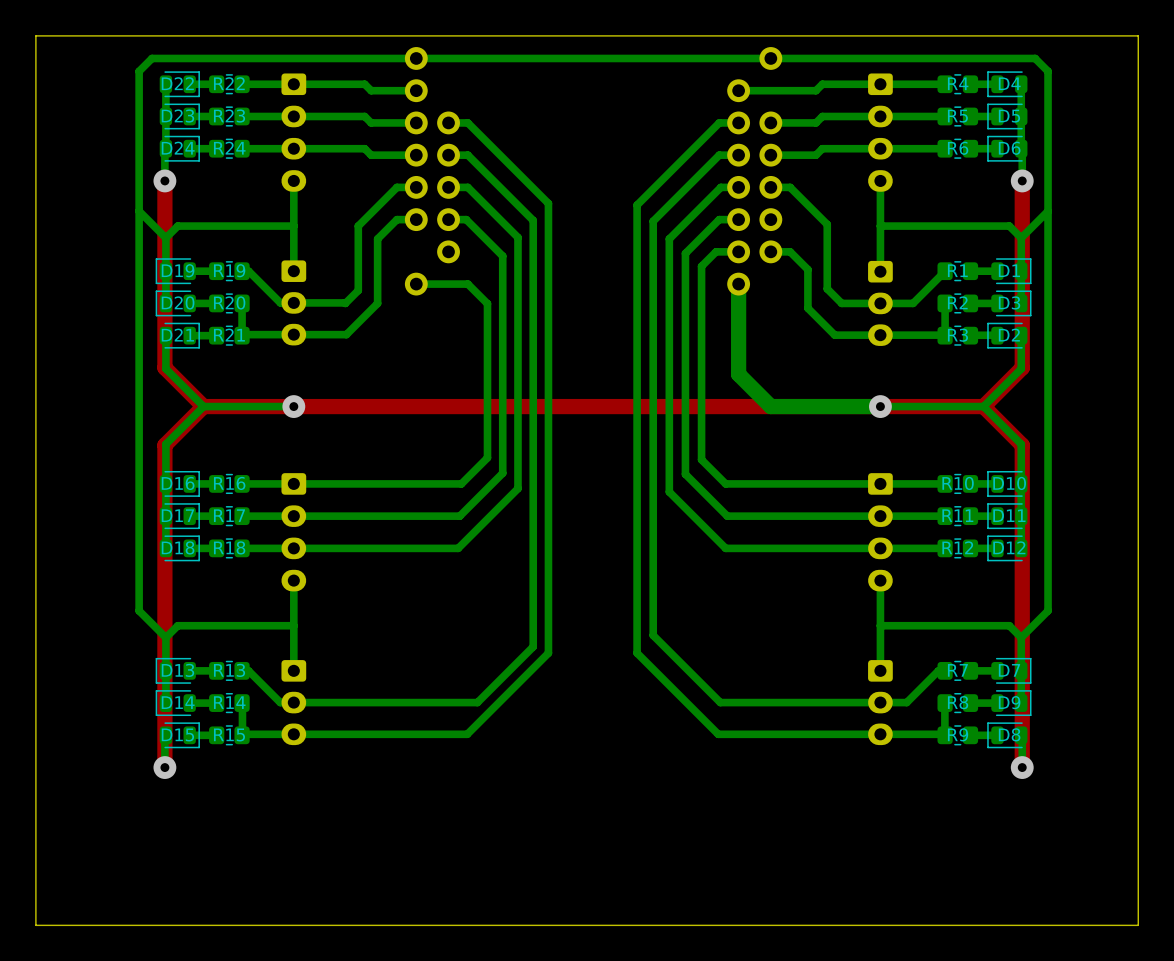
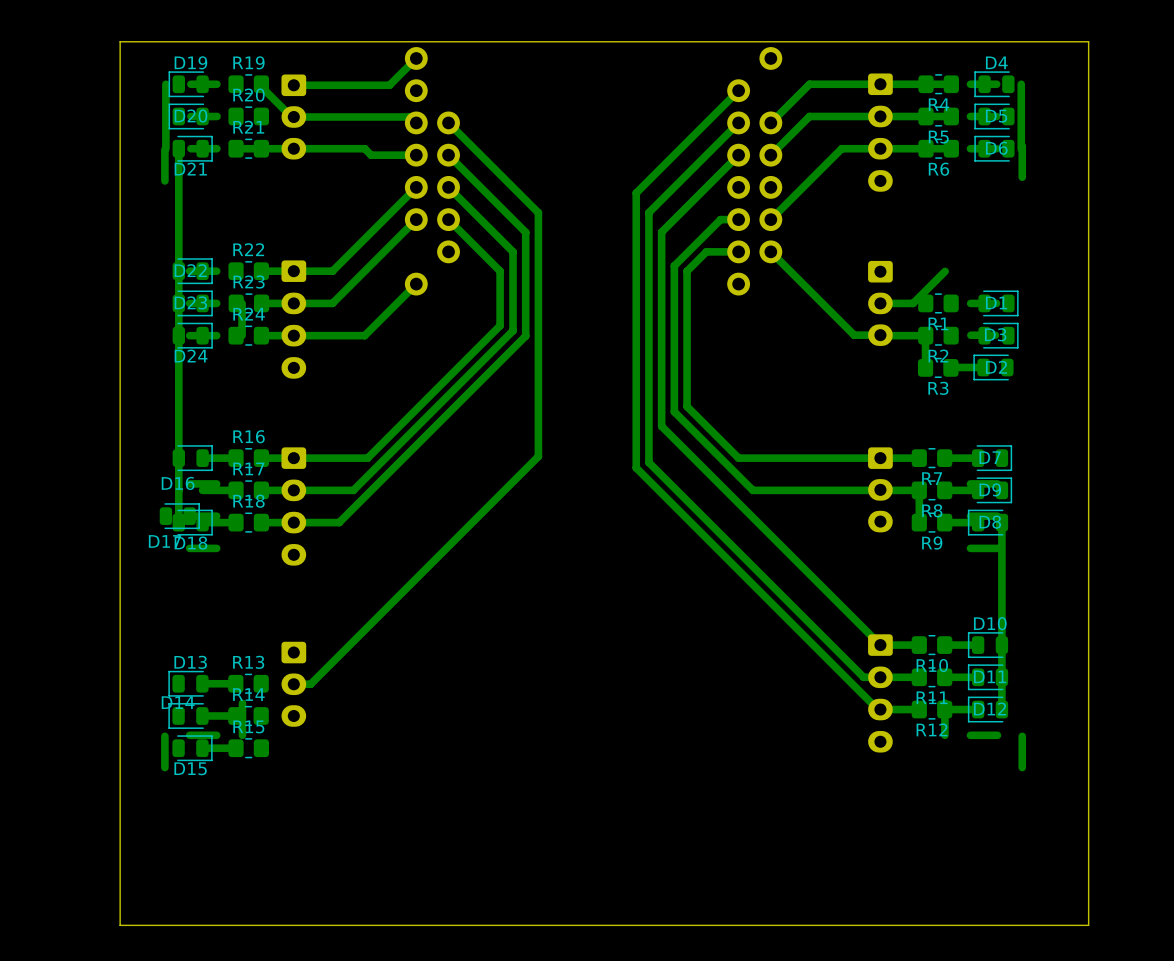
bottom track: none -> (416, 58) (389, 85) (293, 85)
R22 name position: R22 (229, 83) -> R22 (248, 249)
R4 name position: R4 (958, 83) -> R4 (939, 104)
D4 name position: D4 (1009, 83) -> D4 (996, 62)
D22 position: (179, 84) -> (192, 271)
R22 position: (229, 84) -> (248, 271)
bottom track: (242, 84) (364, 84) (371, 90) (416, 90) -> none
bottom track: (822, 84) (815, 90) (738, 90) -> (919, 709) (877, 709) (636, 467) (636, 193) (738, 90)
R4 position: (957, 84) -> (938, 84)
D4 position: (1007, 84) -> (994, 84)
D23 position: (179, 116) -> (192, 303)
R23 position: (229, 116) -> (248, 303)
R23 name position: R23 (229, 116) -> R23 (249, 282)
bottom track: (242, 116) (364, 116) (371, 122) (416, 122) -> (261, 84) (261, 86) (291, 116) (410, 116) (416, 122)
bottom track: (822, 116) (815, 122) (770, 122) -> (822, 84) (809, 84) (770, 122)
R5 position: (957, 116) -> (938, 116)
R5 name position: R5 (957, 116) -> R5 (938, 137)
D5 position: (1007, 116) -> (994, 116)
bottom track: (448, 122) (467, 122) (548, 203) (548, 653) (467, 734) (243, 734) -> (448, 122) (538, 212) (538, 456) (310, 684) (293, 683)
bottom track: (738, 122) (719, 122) (637, 205) (637, 653) (718, 734) (944, 734) -> (738, 122) (648, 212) (648, 462) (863, 677) (919, 677)
part: (293, 132) -> none
bottom track: none -> (178, 148) (178, 522)
D24 name position: D24 (178, 148) -> D24 (191, 356)
D24 position: (179, 148) -> (192, 335)
R24 position: (229, 148) -> (248, 335)
R24 name position: R24 (229, 148) -> R24 (249, 314)
bottom track: (841, 148) (822, 148) (815, 155) (770, 155) -> (822, 116) (809, 116) (770, 155)
bottom track: none -> (841, 148) (770, 219)
R6 position: (957, 148) -> (938, 148)
R6 name position: R6 (958, 148) -> R6 (938, 169)
D6 position: (1007, 148) -> (994, 148)
bottom track: (448, 155) (467, 155) (533, 220) (533, 646) (477, 702) (280, 702) (248, 670) (242, 670) -> (448, 155) (525, 232) (525, 336) (339, 522) (261, 522)
bottom track: (738, 155) (719, 155) (653, 221) (653, 635) (720, 702) (906, 702) (938, 670) (945, 670) -> (738, 155) (661, 232) (661, 426) (880, 645) (919, 645)
top track: (164, 180) (164, 367) (203, 406) -> none
via: (164, 180) -> none
bottom track: (293, 180) (293, 271) -> none
bottom track: (880, 180) (880, 271) -> none
top track: (1022, 180) (1022, 367) (983, 406) -> none
via: (1022, 180) -> none
bottom track: (416, 187) (396, 187) (358, 226) (358, 290) (345, 303) (280, 302) (248, 271) (242, 271) -> (416, 187) (332, 271) (261, 271)
bottom track: (448, 187) (467, 187) (517, 237) (517, 488) (458, 548) (242, 548) -> (448, 187) (513, 251) (513, 330) (353, 490) (261, 490)
bottom track: (738, 187) (720, 187) (669, 238) (669, 491) (725, 548) (944, 548) -> none
bottom track: (770, 187) (790, 187) (827, 224) (827, 288) (841, 303) (880, 303) -> none
bottom track: (139, 211) (165, 237) -> none
bottom track: (1048, 211) (1021, 237) -> none
bottom track: (416, 219) (396, 219) (377, 238) (377, 303) (346, 334) (243, 334) -> (416, 219) (332, 303) (261, 303)
bottom track: (448, 219) (466, 219) (502, 256) (502, 473) (459, 516) (242, 516) -> (448, 219) (500, 271) (500, 325) (367, 458) (261, 458)
bottom track: (720, 219) (685, 253) (685, 474) (727, 516) (944, 516) -> (720, 219) (674, 265) (674, 411) (752, 490) (919, 490) (919, 522)
bottom track: (293, 226) (177, 226) (165, 237) -> none
bottom track: (880, 226) (1009, 226) (1021, 237) -> none
bottom track: (165, 237) (165, 303) -> none
bottom track: (1021, 237) (1021, 303) -> none
bottom track: (716, 251) (701, 266) (701, 459) (725, 483) (944, 483) -> (716, 251) (706, 251) (687, 271) (687, 406) (738, 458) (919, 458)
bottom track: (770, 251) (790, 251) (807, 269) (807, 308) (834, 335) (854, 335) -> (770, 251) (854, 335)
D19 name position: D19 (178, 270) -> D19 (190, 62)
R19 name position: R19 (229, 270) -> R19 (248, 62)
R1 name position: R1 (957, 270) -> R1 (938, 323)
D19 position: (175, 271) -> (188, 84)
R19 position: (229, 271) -> (248, 84)
R1 position: (957, 271) -> (938, 303)
bottom track: (996, 271) (970, 271) -> none
D1 position: (1011, 271) -> (998, 303)
bottom track: (416, 284) (467, 284) (487, 303) (487, 457) (461, 483) (242, 483) -> (416, 284) (364, 335) (261, 335)
bottom track: (738, 284) (738, 374) (770, 406) (983, 406) -> none
R20 name position: R20 (229, 302) -> R20 (248, 95)
part position: (293, 302) -> (293, 116)
R2 name position: R2 (957, 302) -> R2 (938, 356)
D20 position: (175, 303) -> (188, 116)
R20 position: (229, 303) -> (248, 116)
bottom track: (945, 303) (945, 335) -> none
R2 position: (957, 303) -> (938, 335)
D2 position: (1011, 303) -> (998, 335)
part: none -> (293, 319)
bottom track: (165, 335) (165, 368) (203, 406) -> none
D21 name position: D21 (177, 335) -> D21 (190, 169)
D21 position: (179, 335) -> (192, 148)
R21 position: (229, 335) -> (248, 148)
R21 name position: R21 (229, 335) -> R21 (248, 127)
bottom track: (944, 335) (880, 335) -> (925, 367) (925, 335) (880, 335)
R3 position: (957, 335) -> (938, 367)
R3 name position: R3 (957, 335) -> R3 (938, 388)
D3 position: (1007, 335) -> (993, 367)
bottom track: (1021, 335) (1021, 368) (983, 406) -> none
bottom track: none -> (983, 367) (950, 367)
bottom track: (203, 406) (165, 444) (165, 548) -> none
top track: (203, 406) (164, 445) (164, 767) -> none
bottom track: (293, 406) (203, 406) -> none
via: (293, 406) -> none
via: (880, 406) -> none
bottom track: (983, 406) (1021, 444) (1021, 548) -> none
top track: (983, 406) (203, 406) -> none
top track: (983, 406) (1022, 445) (1022, 767) -> none
bottom track: none -> (236, 458) (202, 458)
bottom track: none -> (978, 458) (944, 458)
D16 position: (179, 483) -> (192, 458)
R16 position: (229, 483) -> (248, 458)
R16 name position: R16 (229, 483) -> R16 (249, 436)
R10 position: (957, 483) -> (932, 645)
R10 name position: R10 (958, 483) -> R10 (932, 665)
D10 position: (1007, 483) -> (987, 645)
D10 name position: D10 (1009, 483) -> D10 (990, 623)
part: none -> (880, 489)
bottom track: none -> (236, 490) (202, 490)
bottom track: none -> (977, 490) (944, 490)
D17 name position: D17 (177, 515) -> D17 (165, 541)
R17 name position: R17 (229, 515) -> R17 (248, 468)
R11 name position: R11 (957, 515) -> R11 (932, 697)
R17 position: (229, 516) -> (248, 490)
R11 position: (957, 516) -> (932, 677)
D11 position: (1007, 516) -> (987, 677)
bottom track: none -> (236, 522) (202, 522)
bottom track: none -> (978, 522) (944, 522)
bottom track: none -> (1001, 522) (1001, 709)
part position: (293, 532) -> (293, 506)
part: (880, 532) -> none
D18 name position: D18 (178, 547) -> D18 (190, 543)
R18 name position: R18 (229, 547) -> R18 (248, 501)
R12 name position: R12 (957, 547) -> R12 (931, 729)
D18 position: (179, 548) -> (192, 522)
R18 position: (229, 548) -> (248, 522)
R12 position: (957, 548) -> (932, 709)
D12 position: (1007, 548) -> (987, 709)
bottom track: (293, 580) (293, 670) -> none
bottom track: (880, 580) (880, 670) -> none
bottom track: (293, 625) (177, 625) (165, 637) -> none
bottom track: (880, 625) (1009, 625) (1021, 637) -> none
bottom track: (165, 637) (165, 703) -> none
bottom track: (1021, 637) (1021, 703) -> none
bottom track: (1021, 637) (1048, 610) (1048, 71) (1035, 58) (152, 58) (139, 71) (139, 610) (165, 637) -> none
bottom track: none -> (978, 645) (944, 645)
part footprint: [868, 660, 893, 746] -> [868, 634, 893, 753]
D13 position: (175, 670) -> (188, 683)
D13 name position: D13 (177, 670) -> D13 (190, 662)
bottom track: (216, 670) (189, 670) -> none
R13 position: (229, 670) -> (248, 683)
R13 name position: R13 (229, 670) -> R13 (248, 662)
R7 position: (957, 670) -> (932, 458)
R7 name position: R7 (957, 670) -> R7 (932, 478)
bottom track: (997, 670) (970, 670) -> none
D7 position: (1011, 670) -> (992, 458)
bottom track: none -> (978, 677) (944, 677)
bottom track: none -> (235, 683) (202, 683)
R14 name position: R14 (229, 702) -> R14 (248, 694)
part position: (293, 702) -> (293, 684)
R8 name position: R8 (958, 702) -> R8 (932, 510)
D14 position: (175, 703) -> (188, 715)
bottom track: (216, 703) (189, 703) -> none
R14 position: (229, 703) -> (248, 715)
R8 position: (957, 703) -> (932, 490)
bottom track: (997, 703) (970, 703) -> none
D8 position: (1011, 703) -> (992, 490)
bottom track: none -> (978, 709) (944, 709)
bottom track: none -> (235, 715) (202, 715)
D15 name position: D15 (177, 734) -> D15 (190, 768)
R15 name position: R15 (229, 734) -> R15 (248, 726)
R9 name position: R9 (958, 734) -> R9 (932, 543)
D15 position: (179, 735) -> (192, 748)
R15 position: (229, 735) -> (248, 748)
R9 position: (957, 735) -> (932, 522)
D9 position: (1007, 735) -> (987, 522)
bottom track: none -> (236, 748) (203, 748)
via: (164, 767) -> none
via: (1022, 767) -> none
board edge: (1088, 925) (1138, 925) (1138, 35) (35, 35) (35, 925) (120, 925) -> (1088, 925) (1088, 41) (120, 41) (120, 925)

